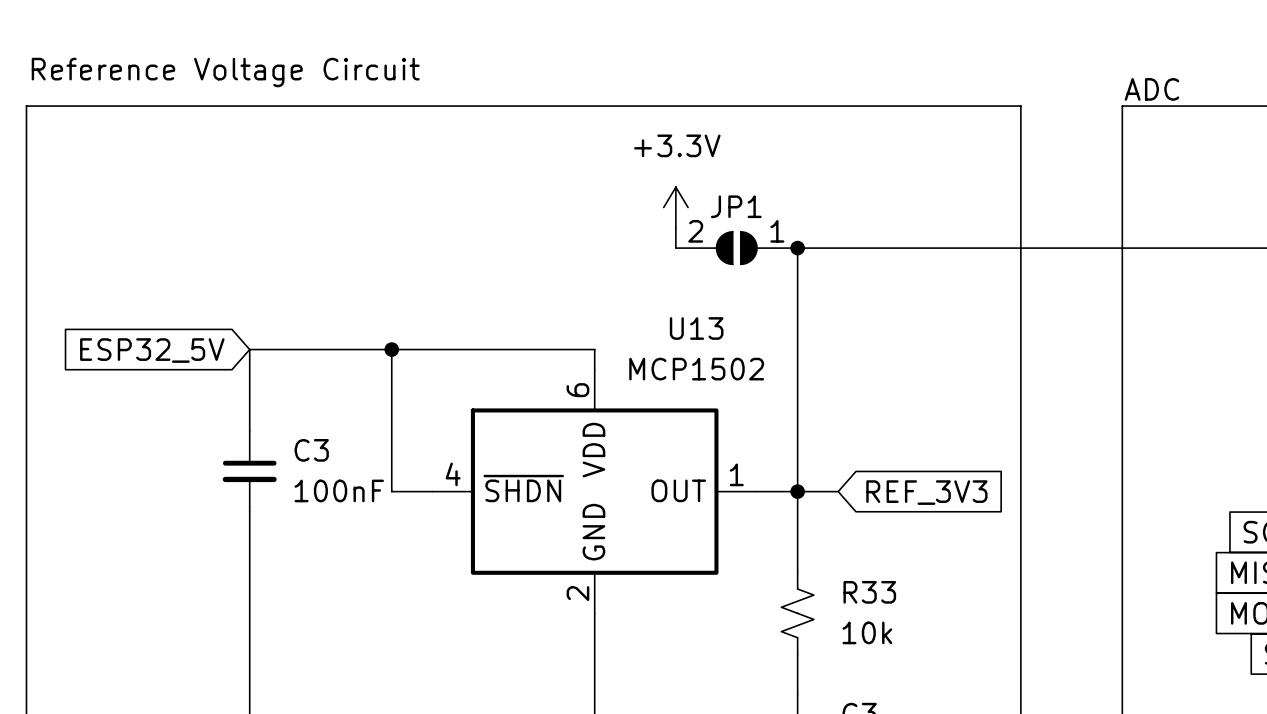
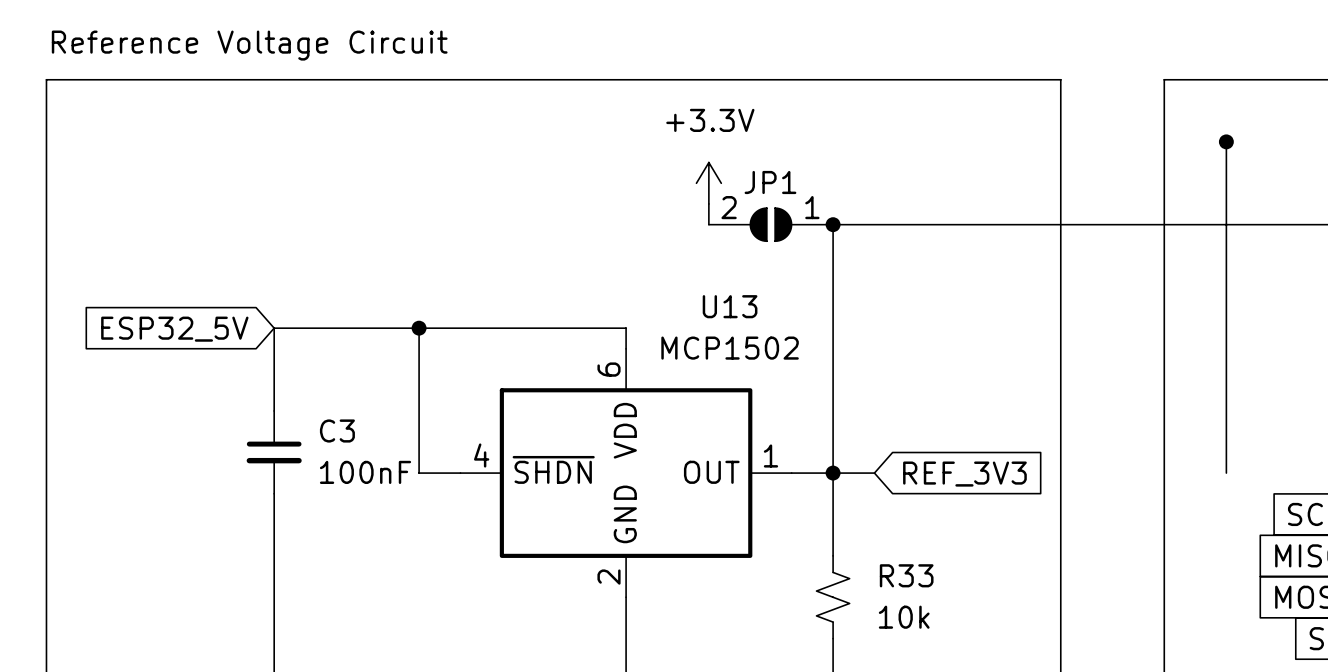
text: ADC (1151, 89) -> none
wire: none -> (1226, 141) (1226, 473)
junction: none -> (1226, 141)

